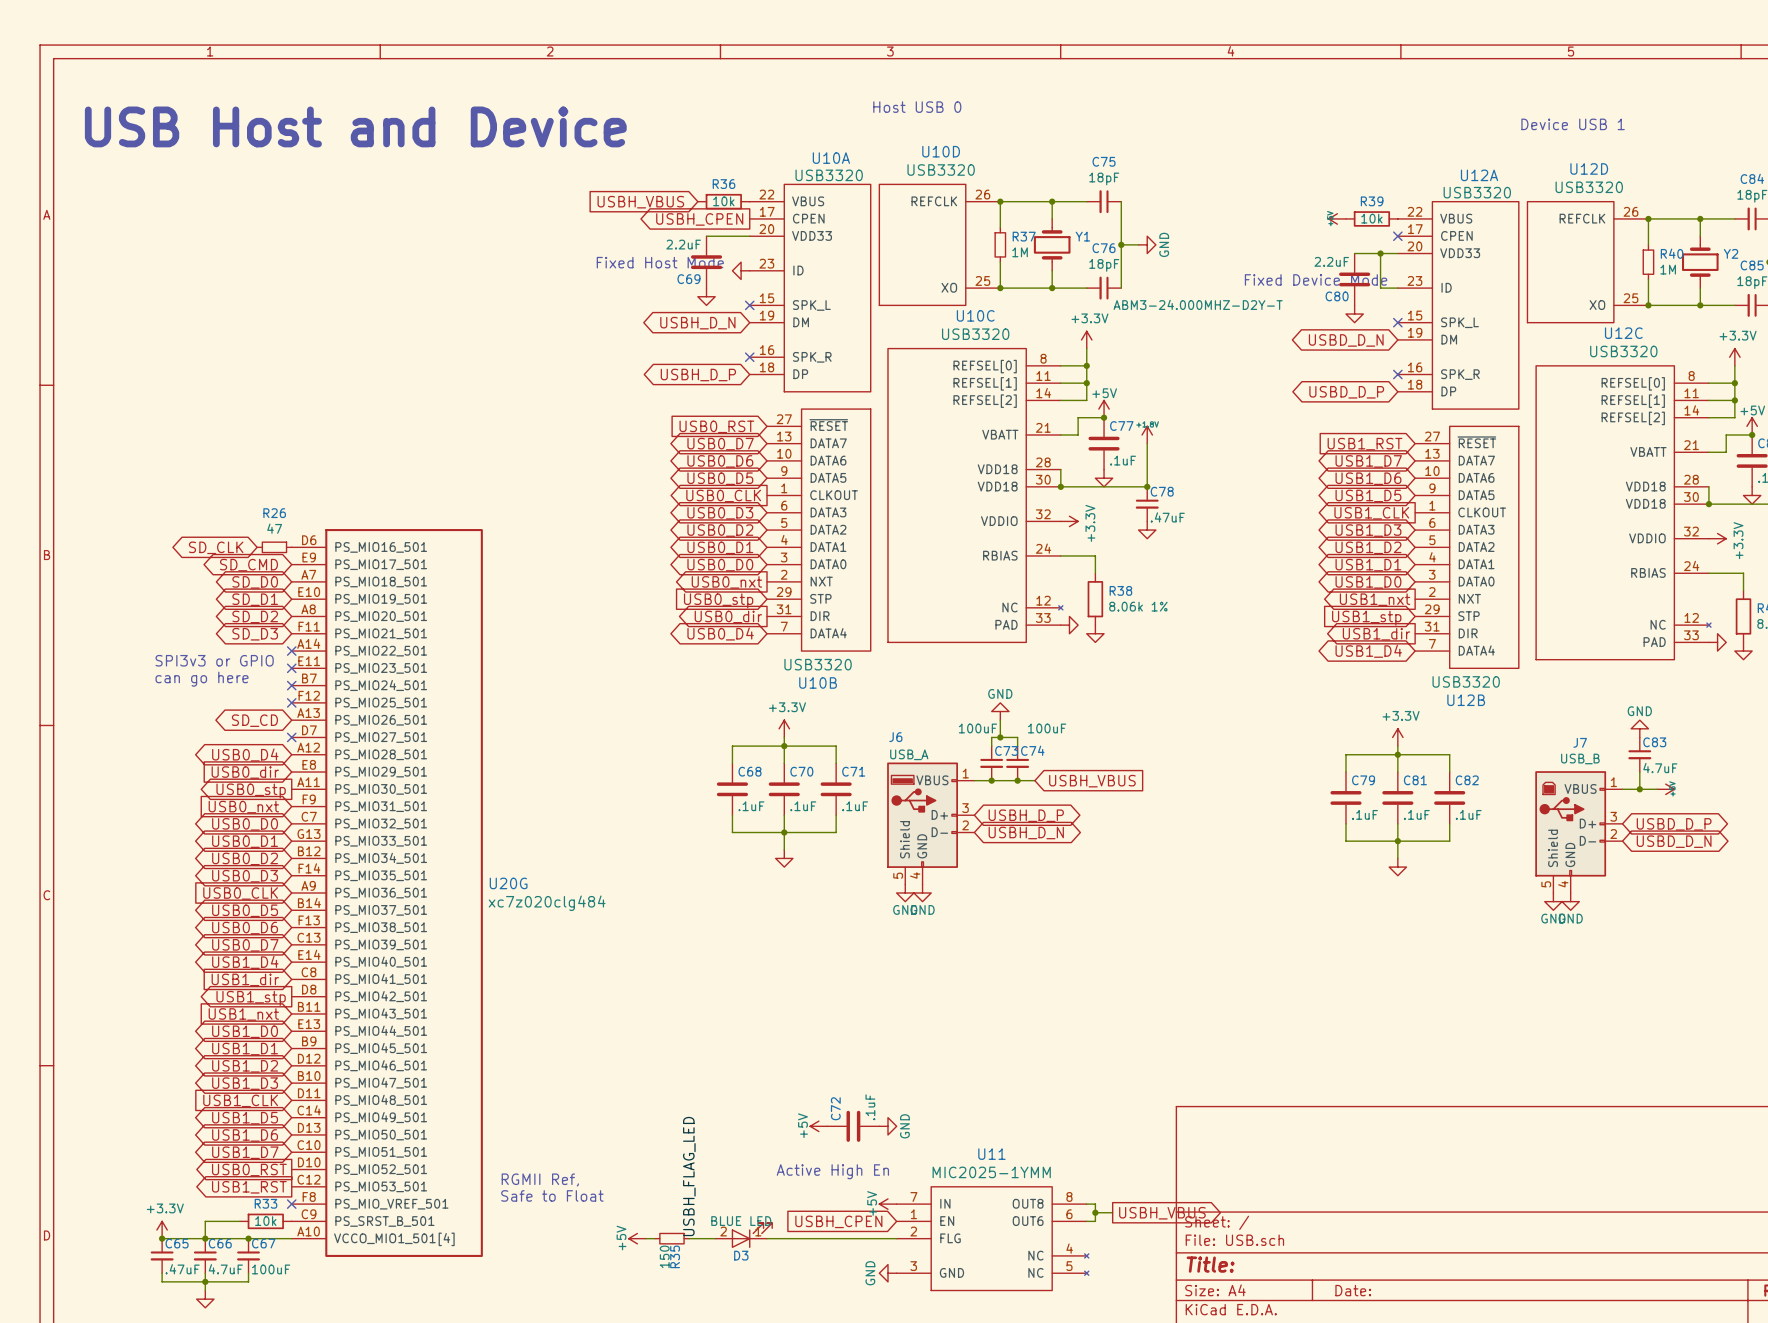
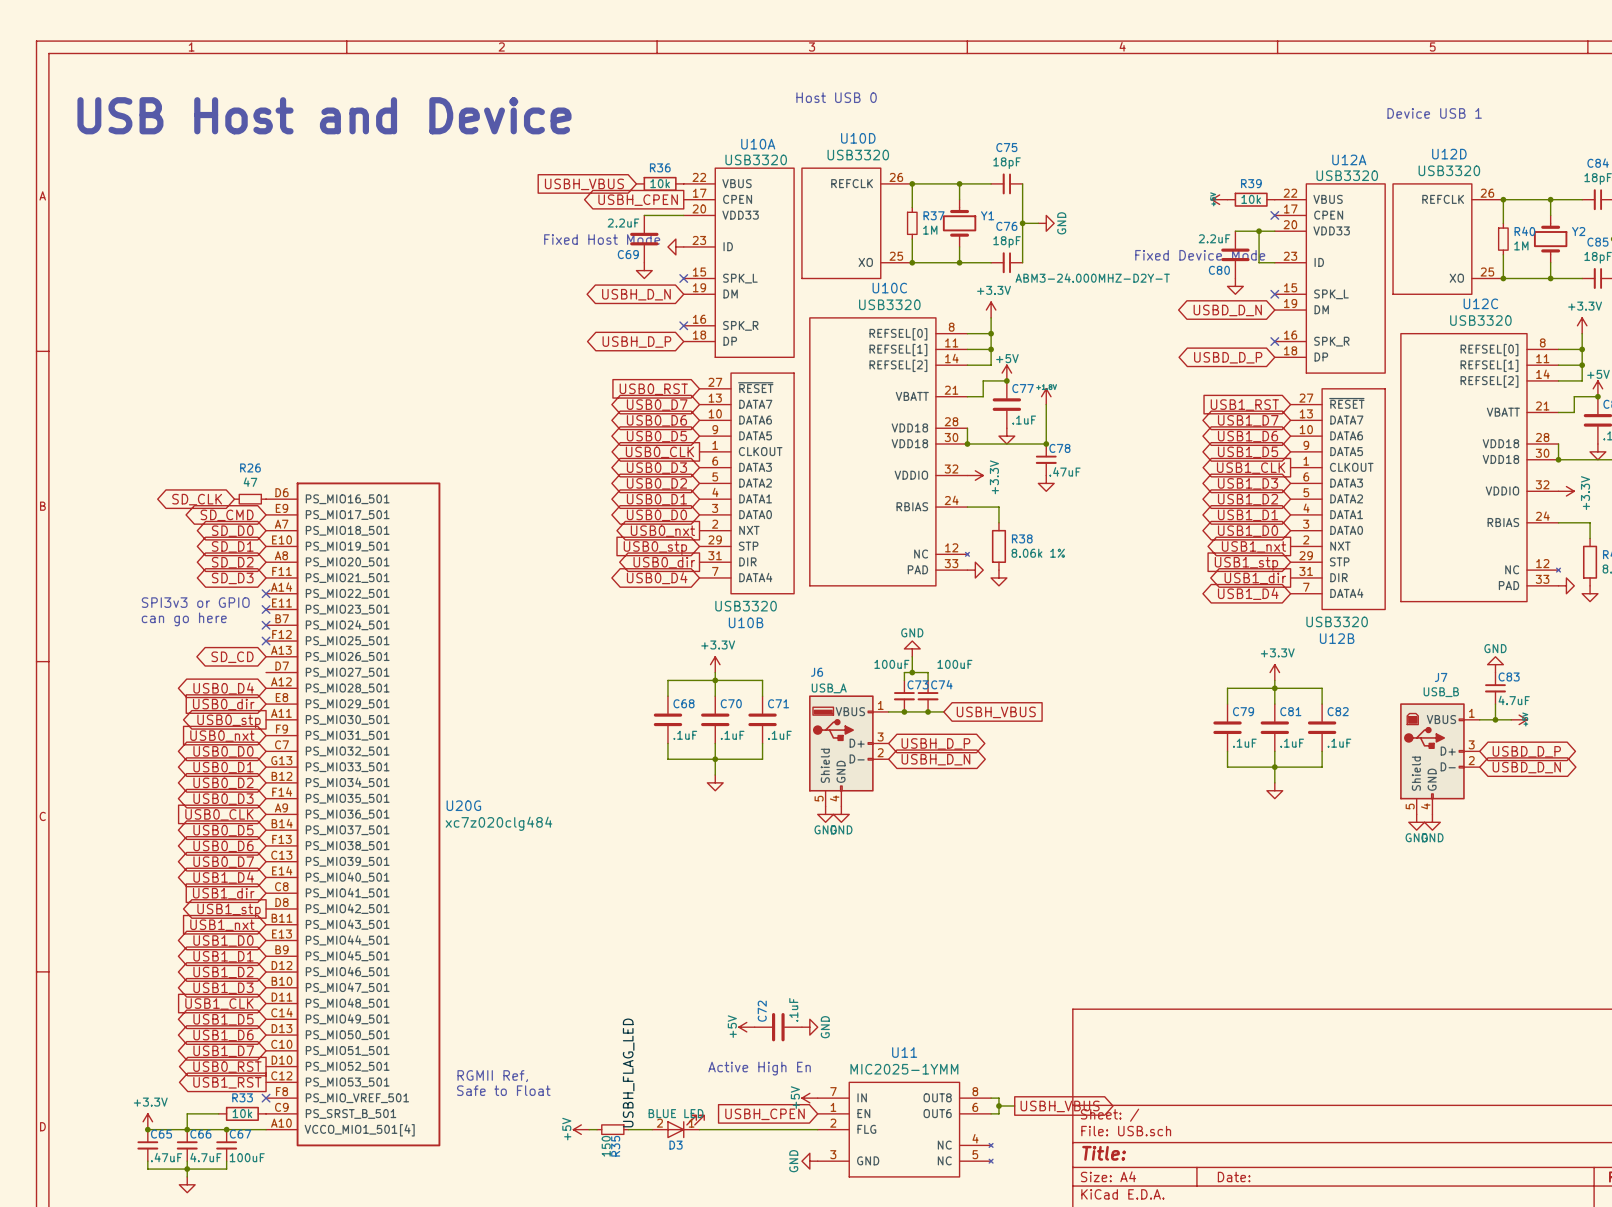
no-connect mark: (291, 737) -> none

